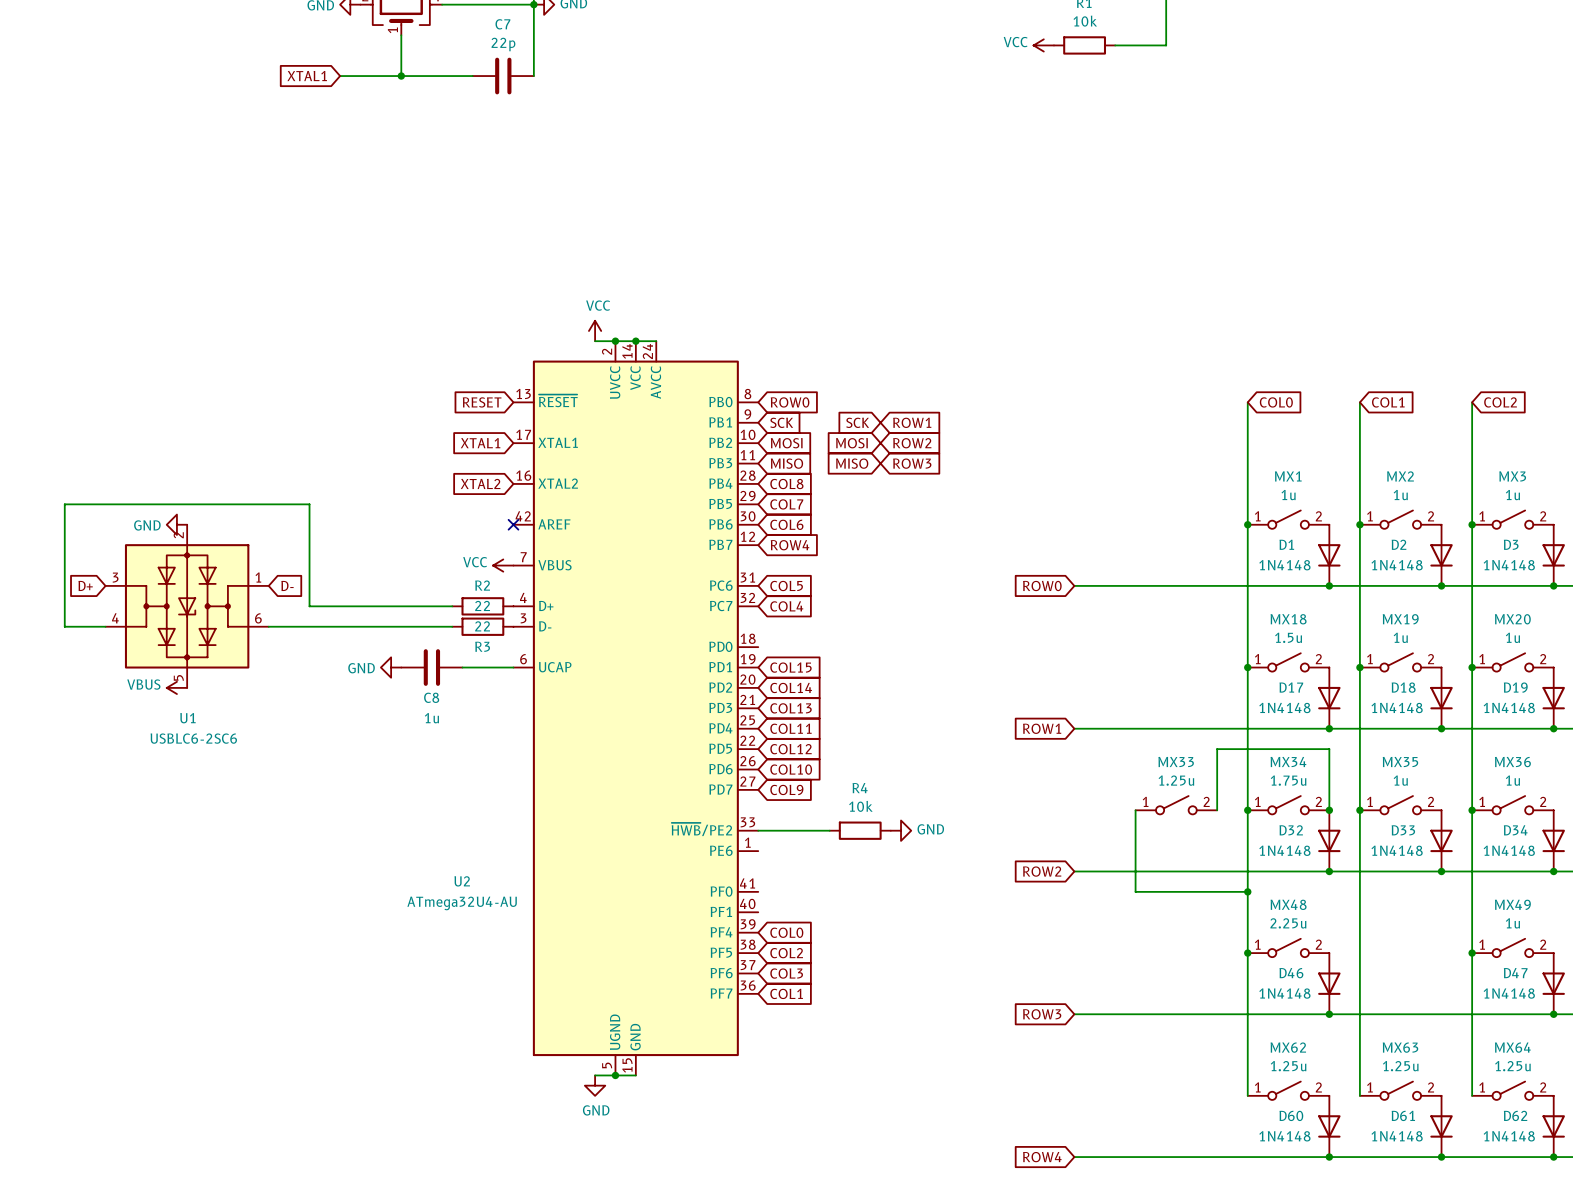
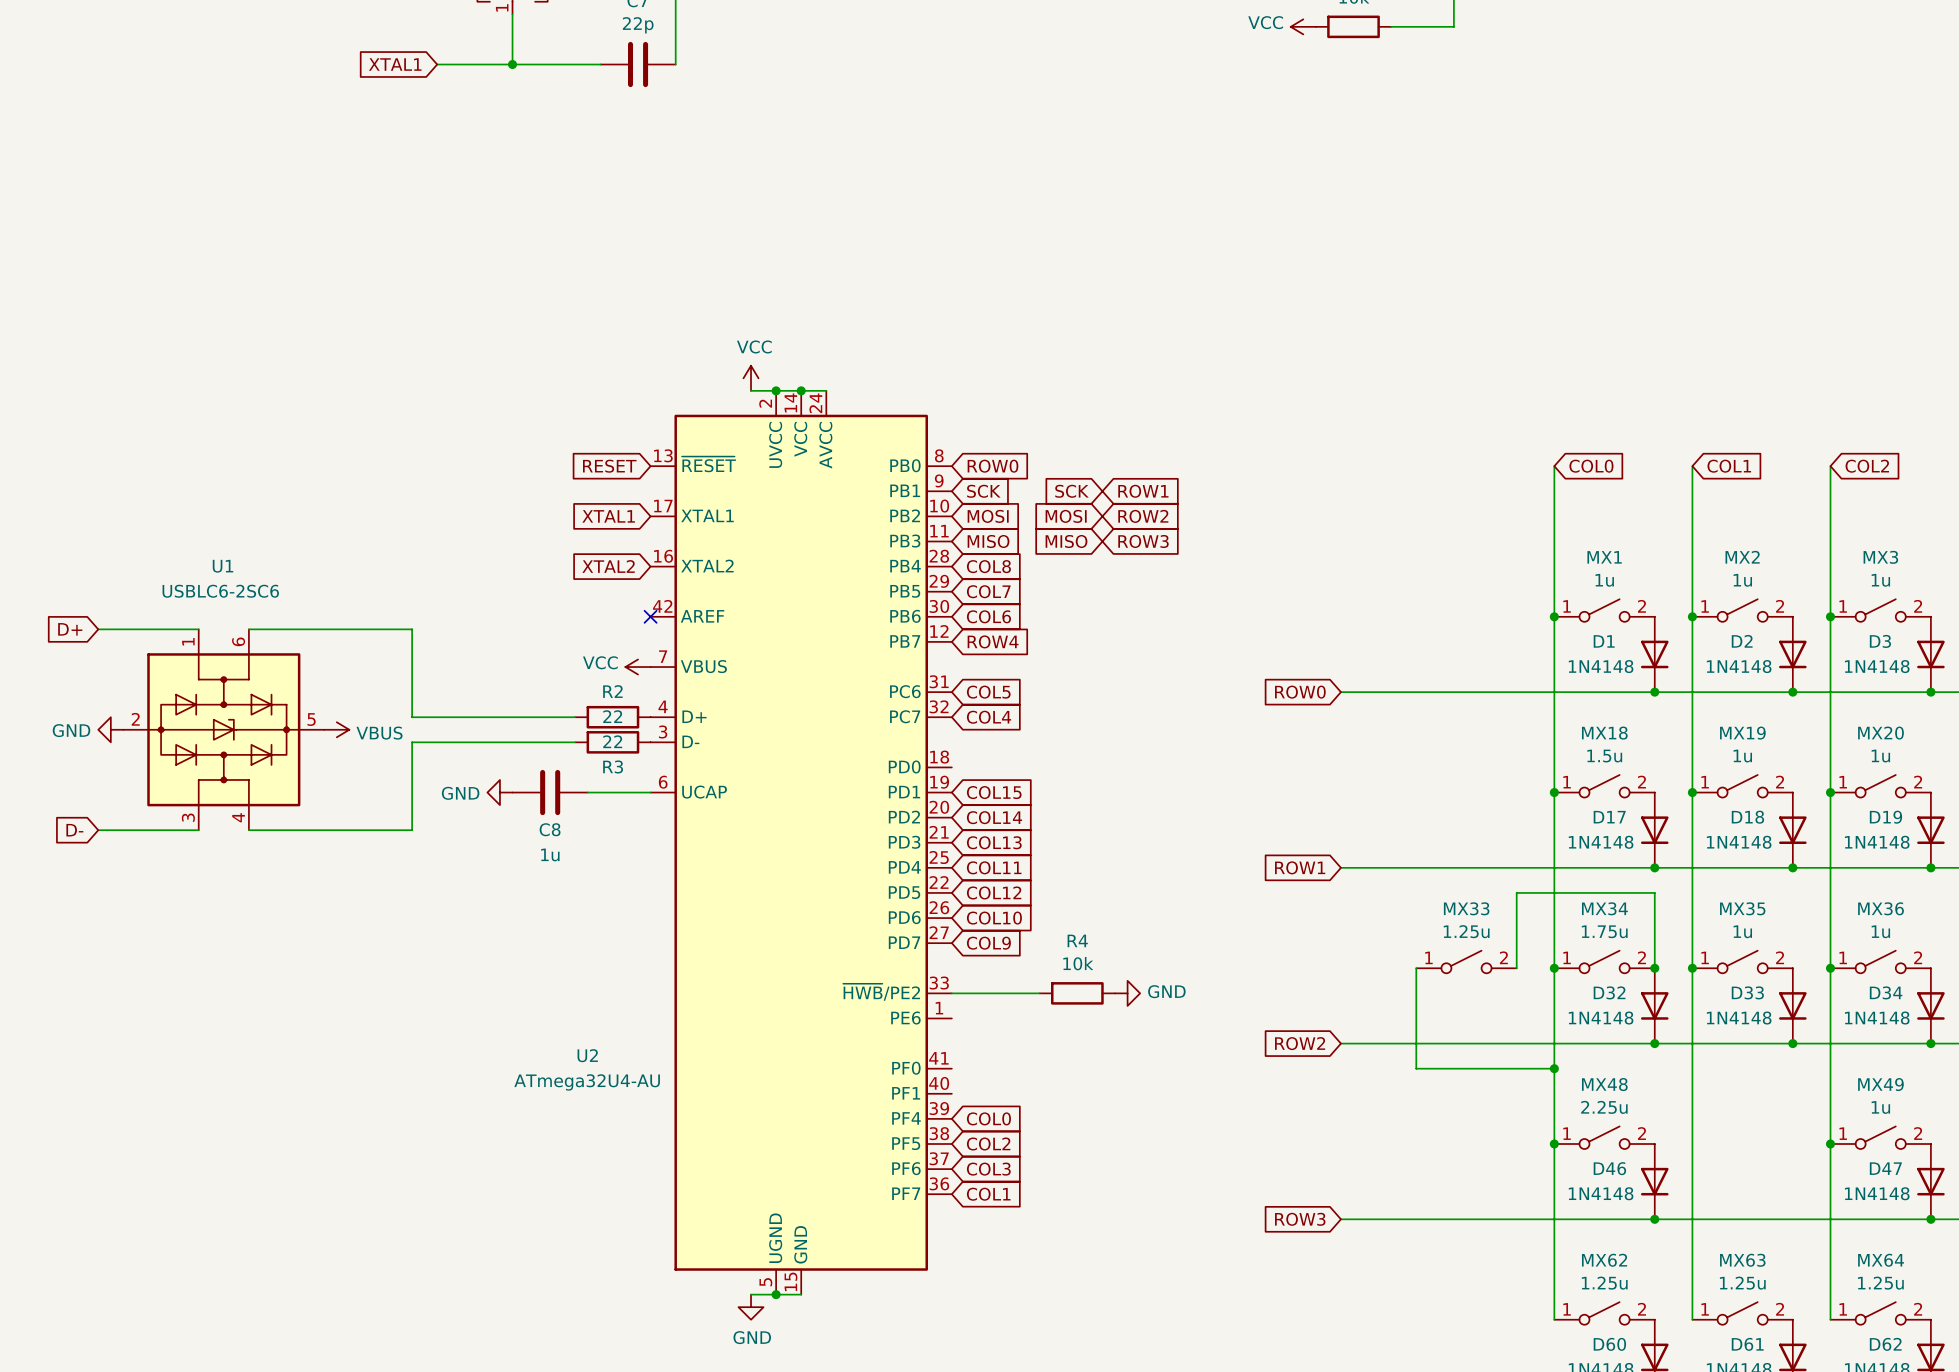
power symbol position: GND (176, 524) -> GND (110, 729)
wire: none -> (98, 629) (198, 629)
global label position: D+ (85, 585) -> D+ (70, 629)
global label: D- (287, 585) -> none
U1 rotation: 0° (187, 606) -> 90° counterclockwise (223, 729)
wire: (319, 606) (309, 606) (309, 504) (64, 504) (64, 626) (105, 626) -> (412, 717) (412, 629) (248, 629)
wire: (268, 626) (319, 626) -> (248, 830) (412, 830) (412, 742)
power symbol rotation: 0° (176, 687) -> 180° (336, 729)
power symbol position: VBUS (176, 687) -> VBUS (336, 729)
global label: none -> D- (74, 830)
wire: none -> (98, 830) (198, 830)
U1 name position: U1 (187, 718) -> U1 (222, 566)
U1 value position: USBLC6-2SC6 (193, 738) -> USBLC6-2SC6 (220, 591)

